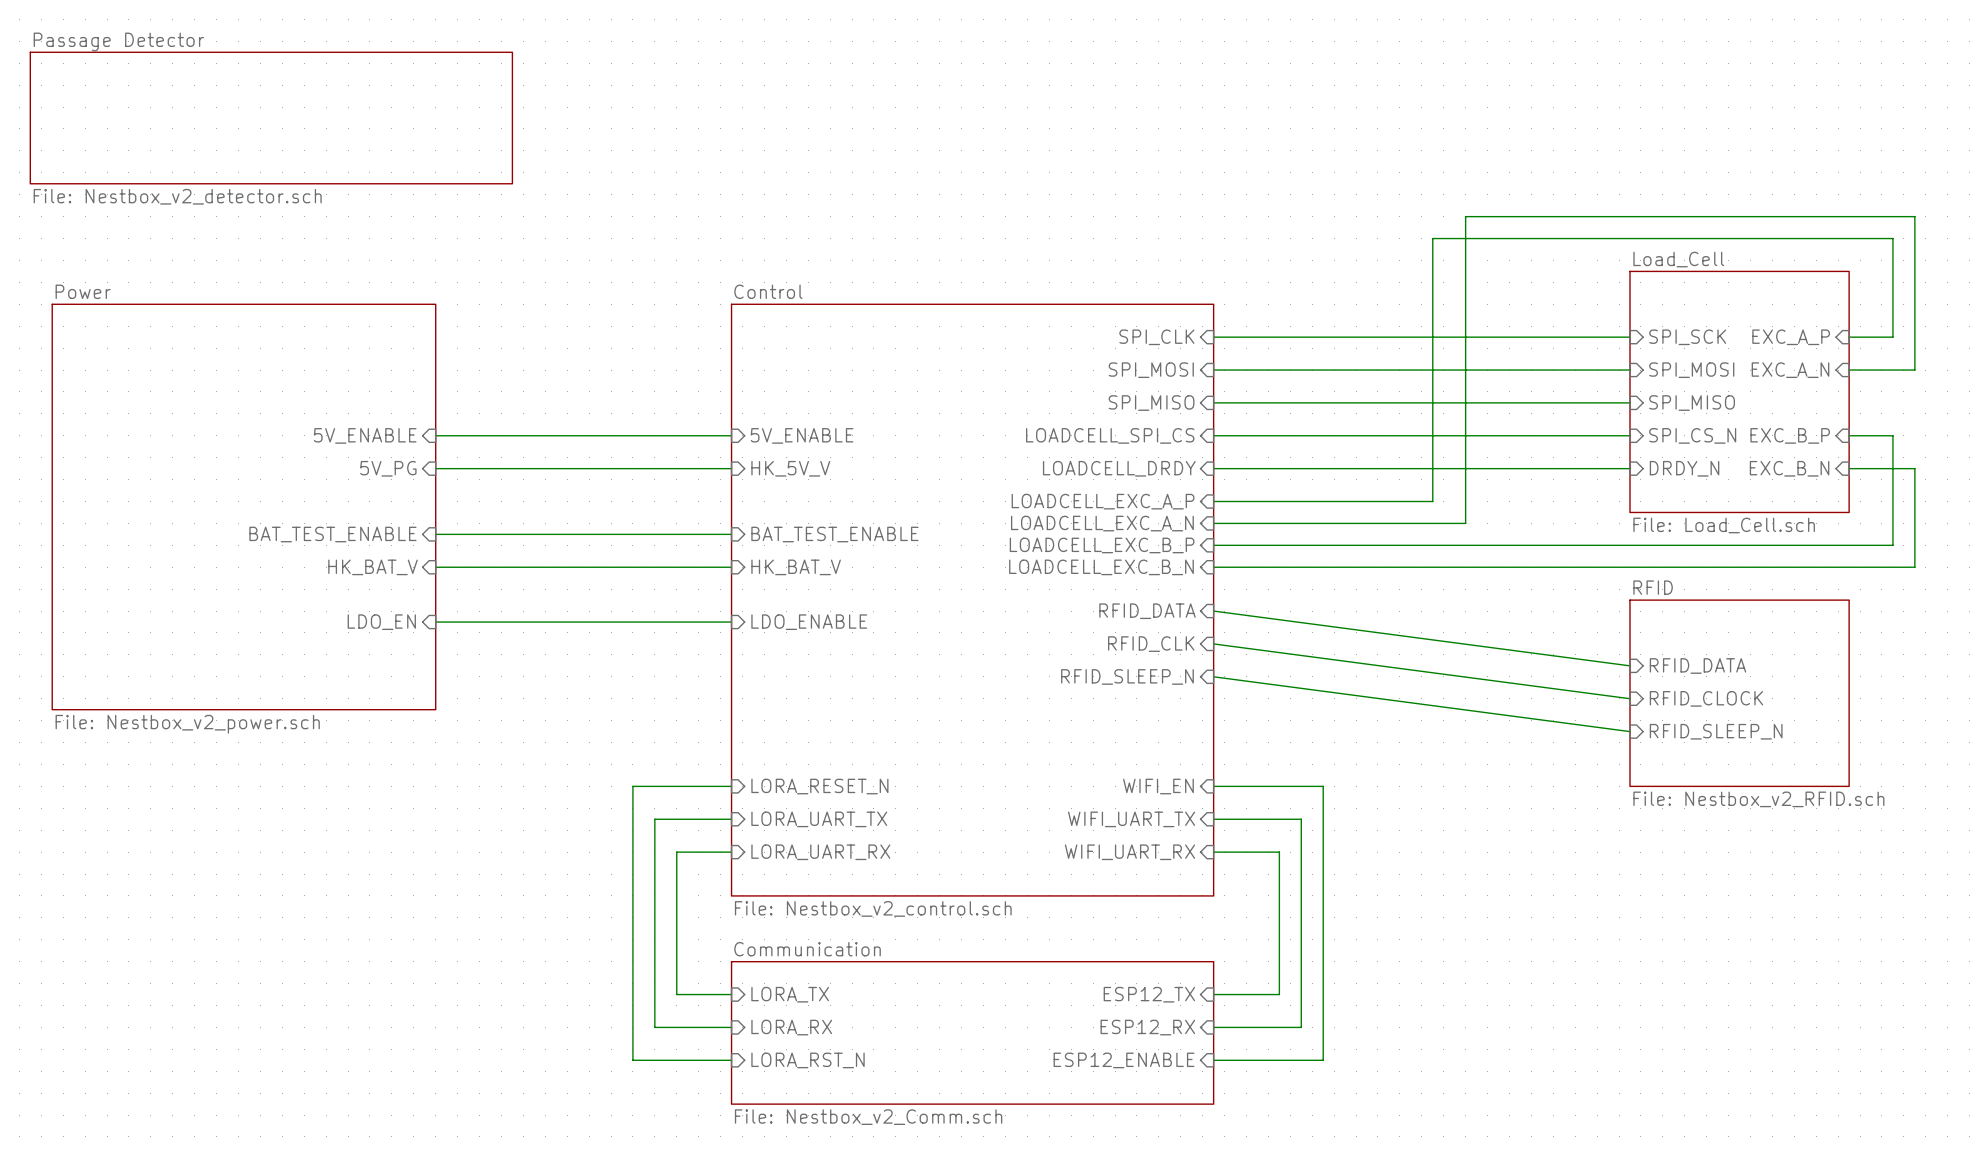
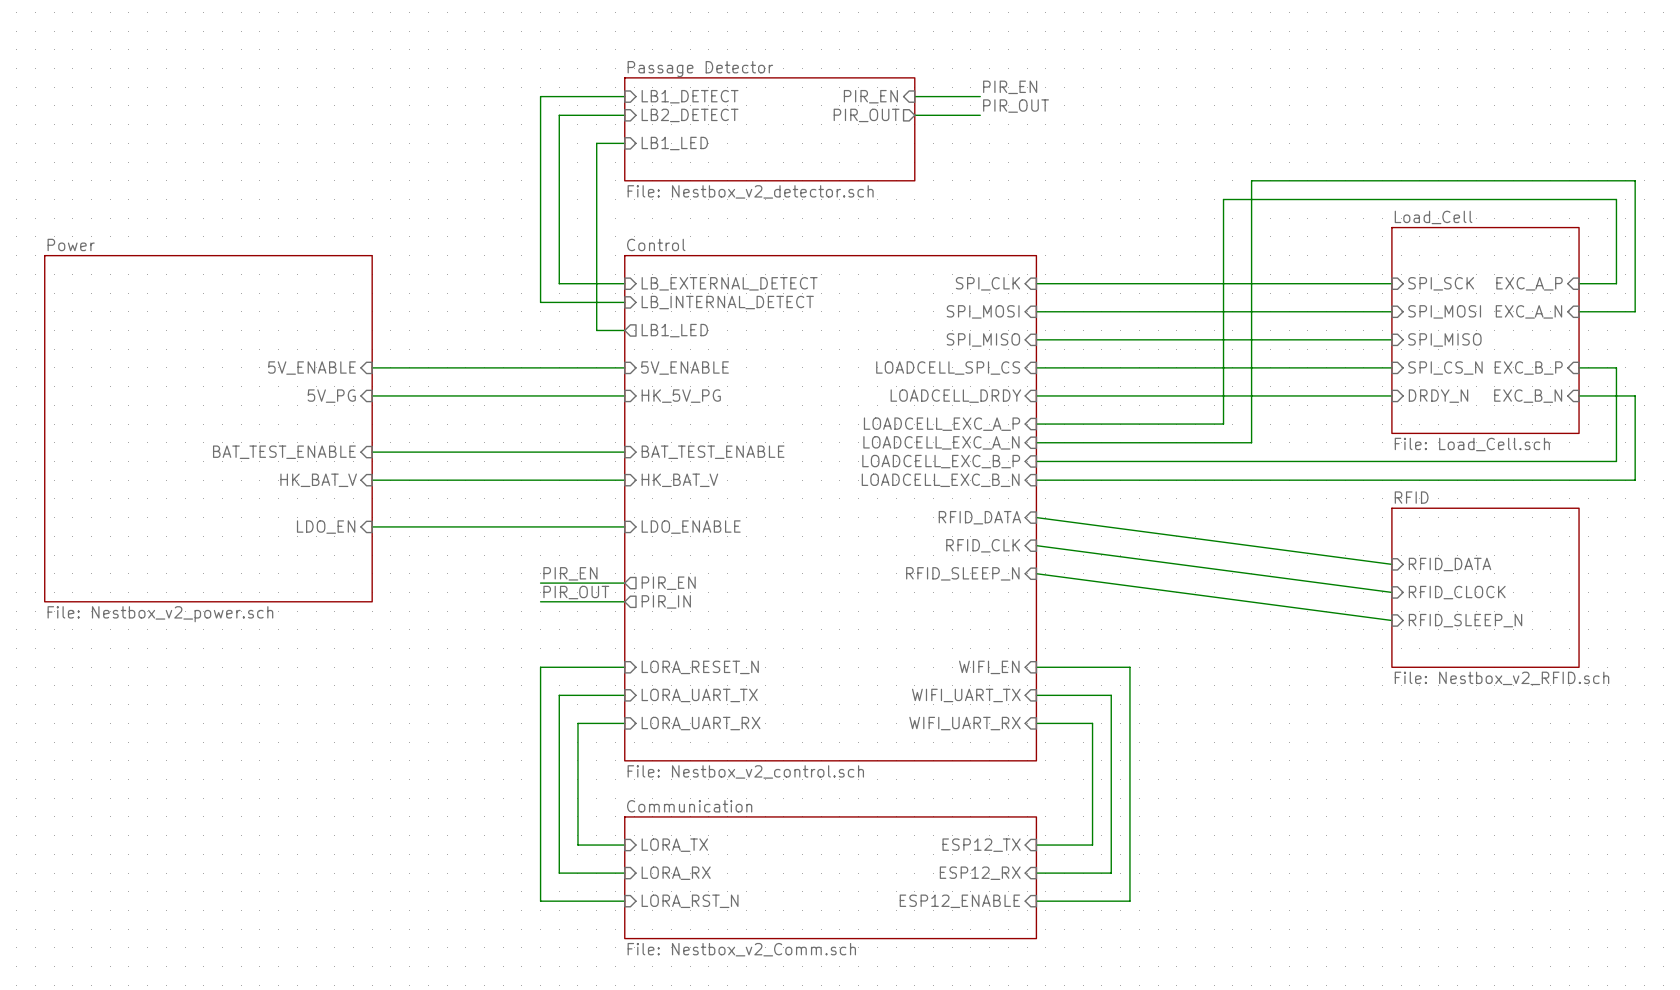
label: none -> PIR_EN (1010, 87)
sheet Passage Detector: File: Nestbox_v2_detector.sch (271, 118) -> none
wire: none -> (624, 96) (540, 96) (540, 302) (624, 302)
sheet pin: none -> LB1_DETECT (690, 96)
sheet pin: none -> PIR_EN (870, 96)
wire: none -> (914, 96) (980, 96)
label: none -> PIR_OUT (1016, 106)
wire: none -> (624, 115) (559, 115) (559, 283) (624, 283)
wire: none -> (914, 115) (980, 115)
sheet pin: none -> LB2_DETECT (690, 115)
sheet pin: none -> PIR_OUT (866, 115)
sheet Passage Detector: none -> File: Nestbox_v2_detector.sch (769, 129)
wire: none -> (624, 143) (596, 143) (596, 330) (624, 330)
sheet pin: none -> LB1_LED (674, 143)
sheet pin: none -> LB_EXTERNAL_DETECT (729, 283)
sheet pin: none -> LB_INTERNAL_DETECT (727, 302)
sheet pin: none -> LB1_LED (674, 330)
sheet pin: HK_5V_V (790, 468) -> HK_5V_PG (681, 396)
label: none -> PIR_EN (570, 573)
wire: none -> (540, 583) (624, 583)
sheet pin: none -> PIR_EN (668, 583)
label: none -> PIR_OUT (576, 592)
wire: none -> (540, 601) (624, 601)
sheet pin: none -> PIR_IN (666, 601)

